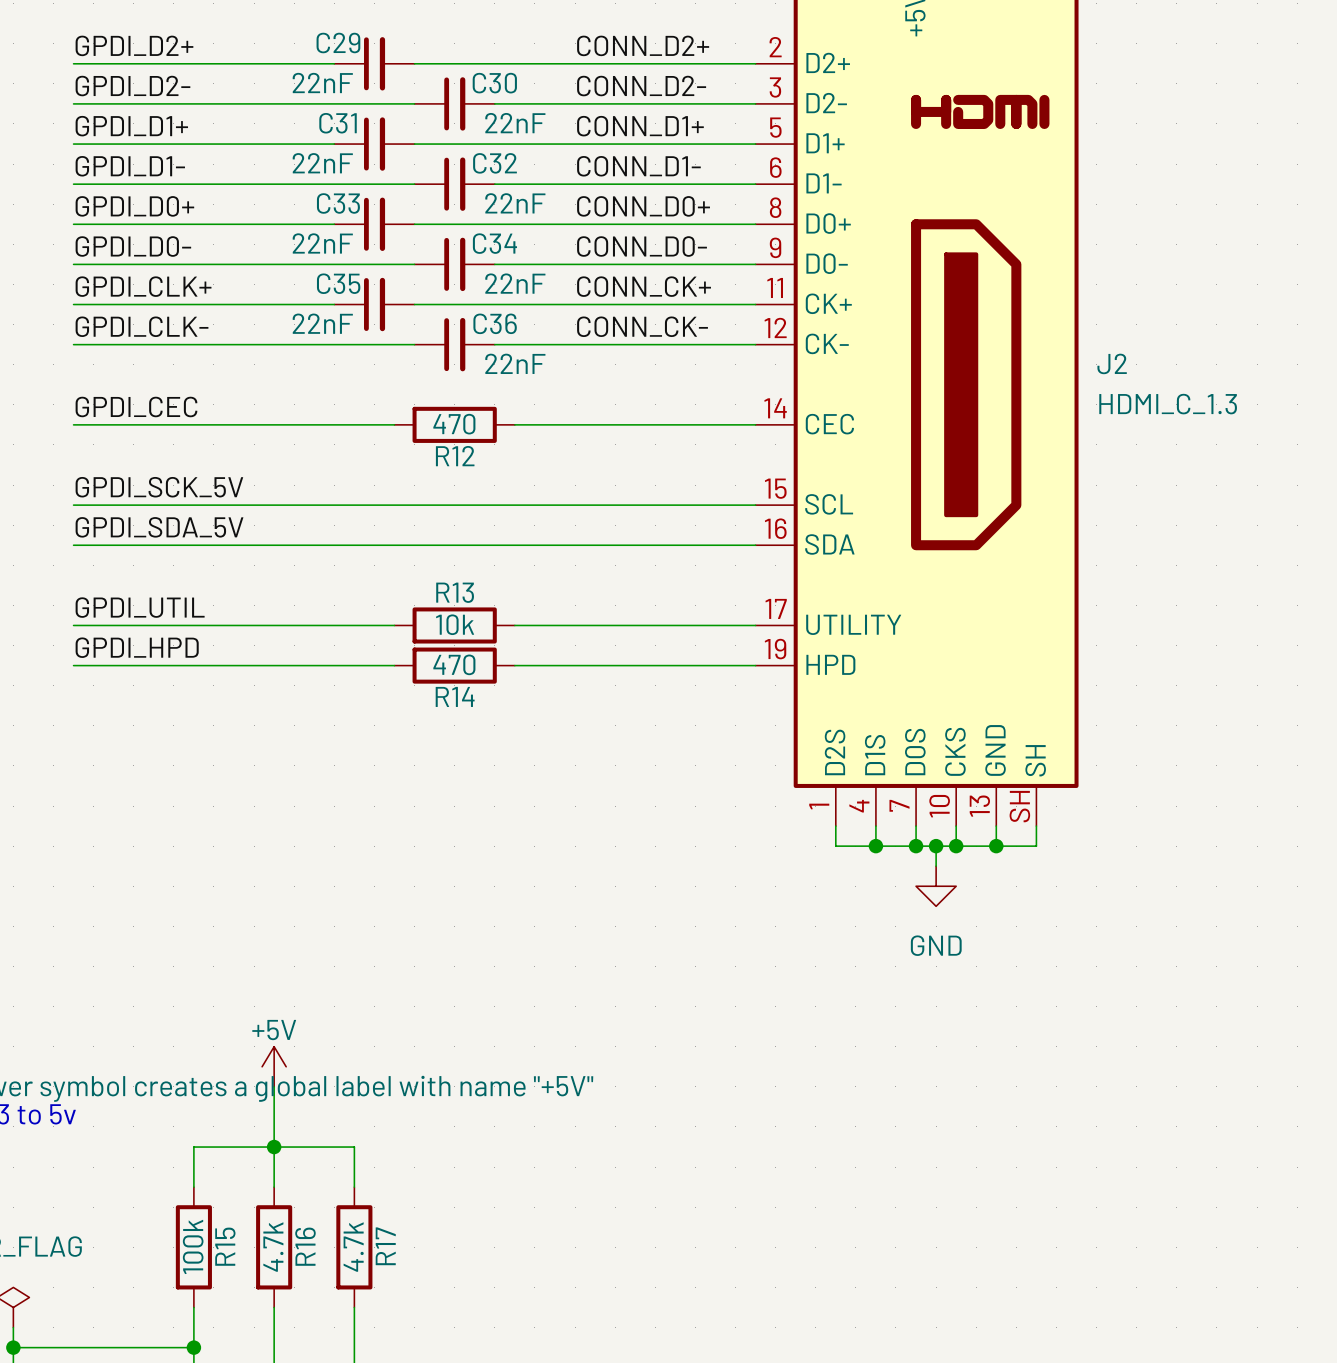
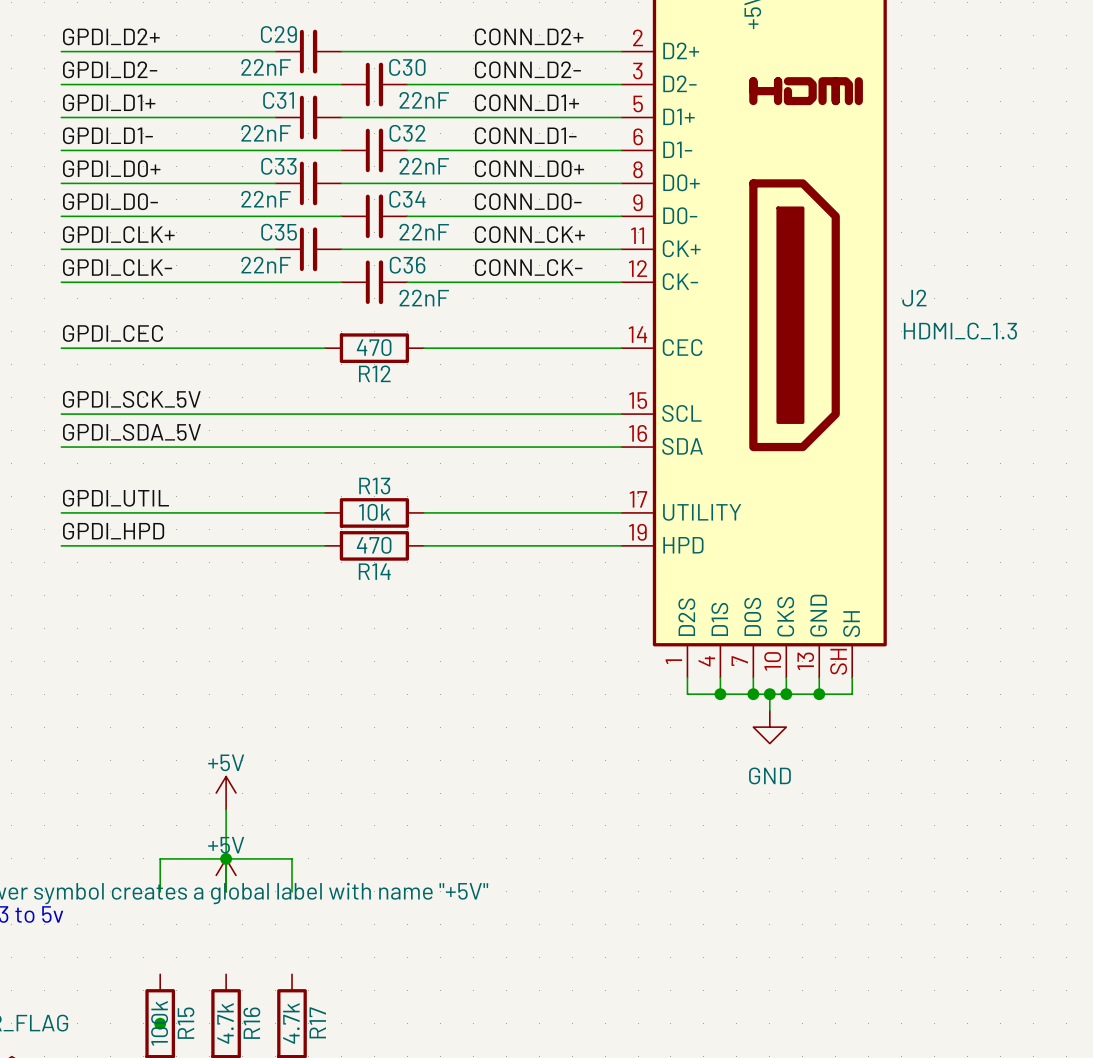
power symbol: none -> +5V (226, 793)
junction: none -> (226, 858)
wire: (274, 1086) (274, 1187) -> (226, 891) (226, 809)
junction: (274, 1147) -> none
wire: (193, 1187) (193, 1147) (354, 1147) (354, 1187) -> (160, 891) (160, 858) (292, 858) (292, 891)
junction: none -> (160, 1023)

